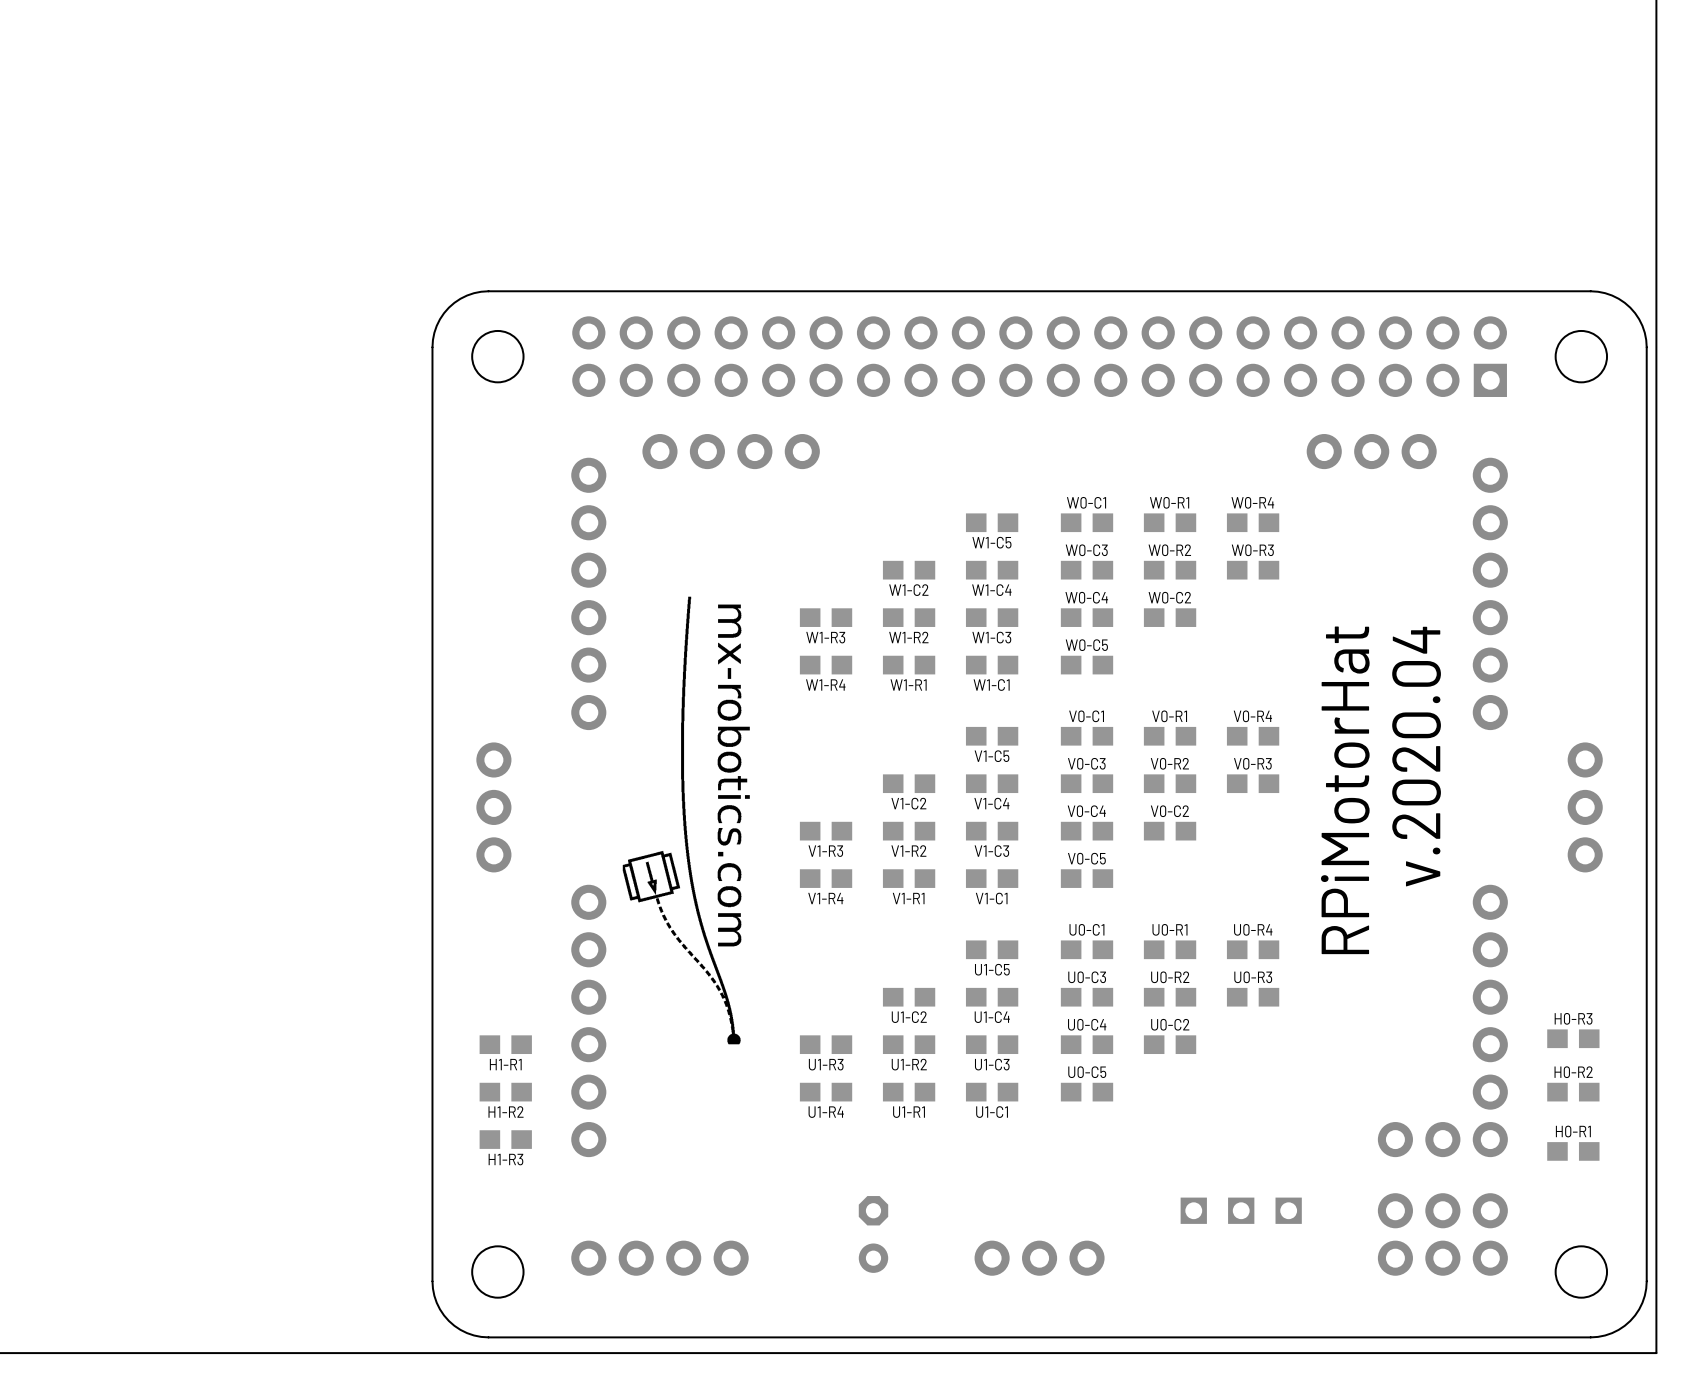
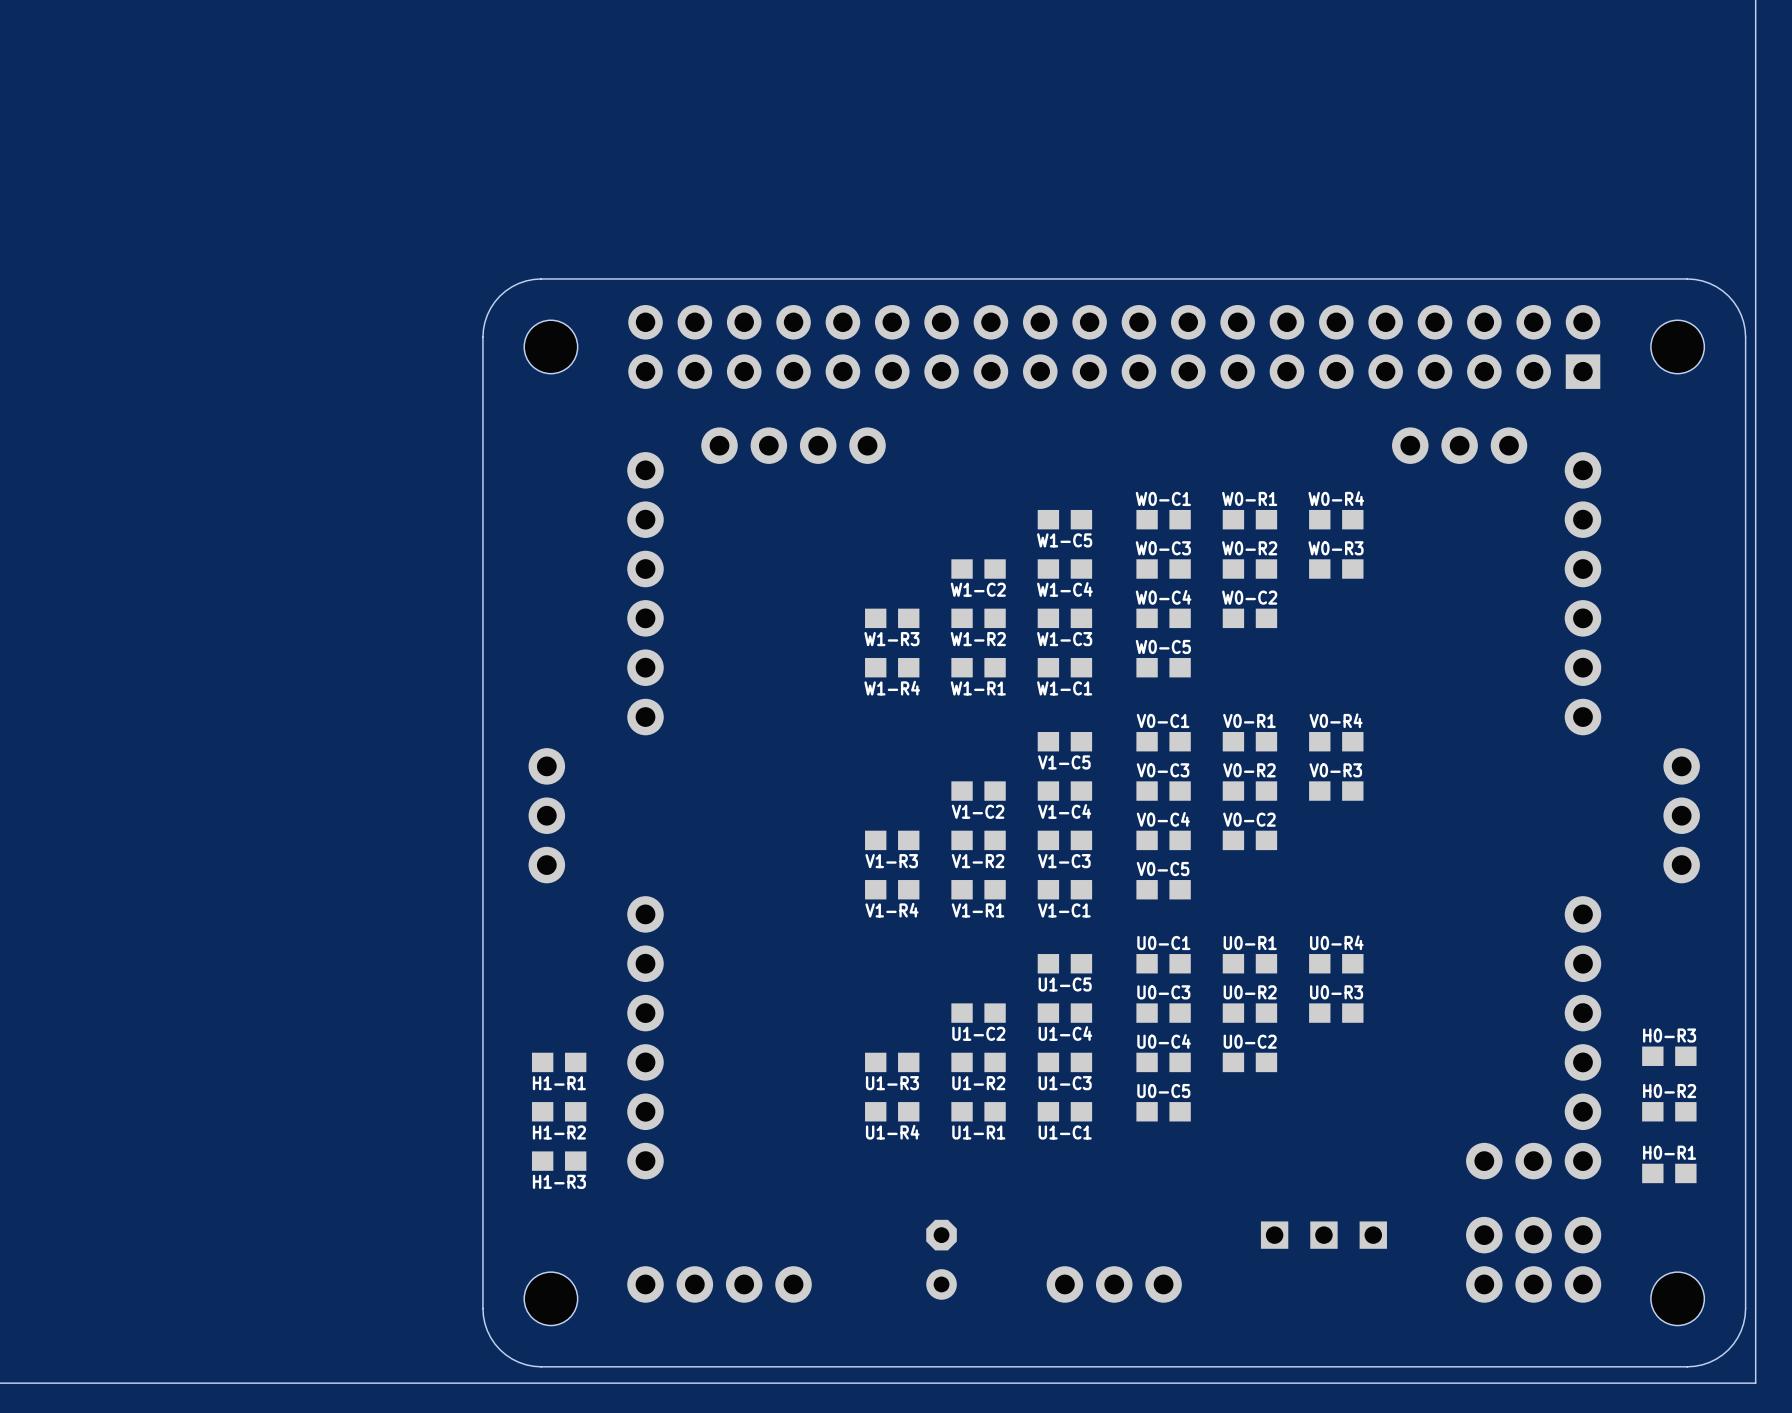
drawing: [622, 596, 750, 1045] -> none
text: v.2020.04 (1416, 756) -> none
text: RPiMotorHat (1345, 790) -> none

